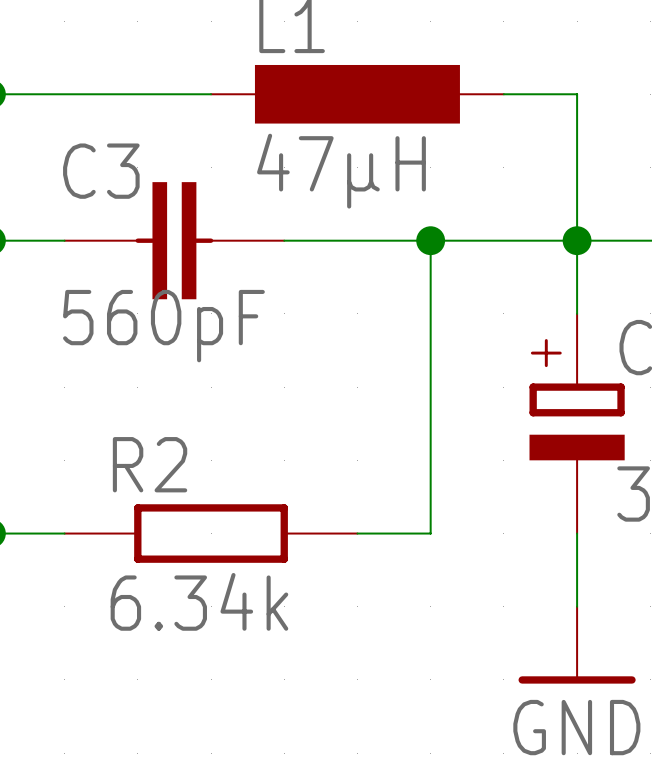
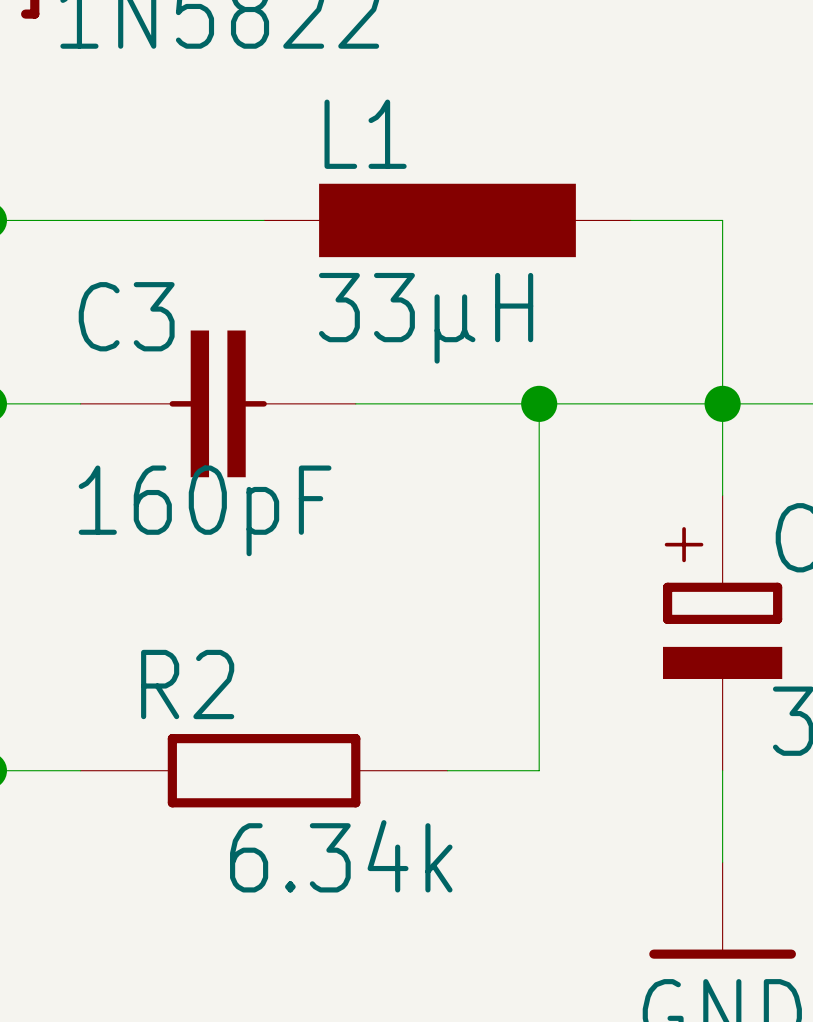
L1 value: 47µH (341, 171) -> 33µH (426, 318)
C3 value: 560pF (163, 326) -> 160pF (205, 510)
R2 value position: 6.34k (199, 601) -> 6.34k (341, 856)

